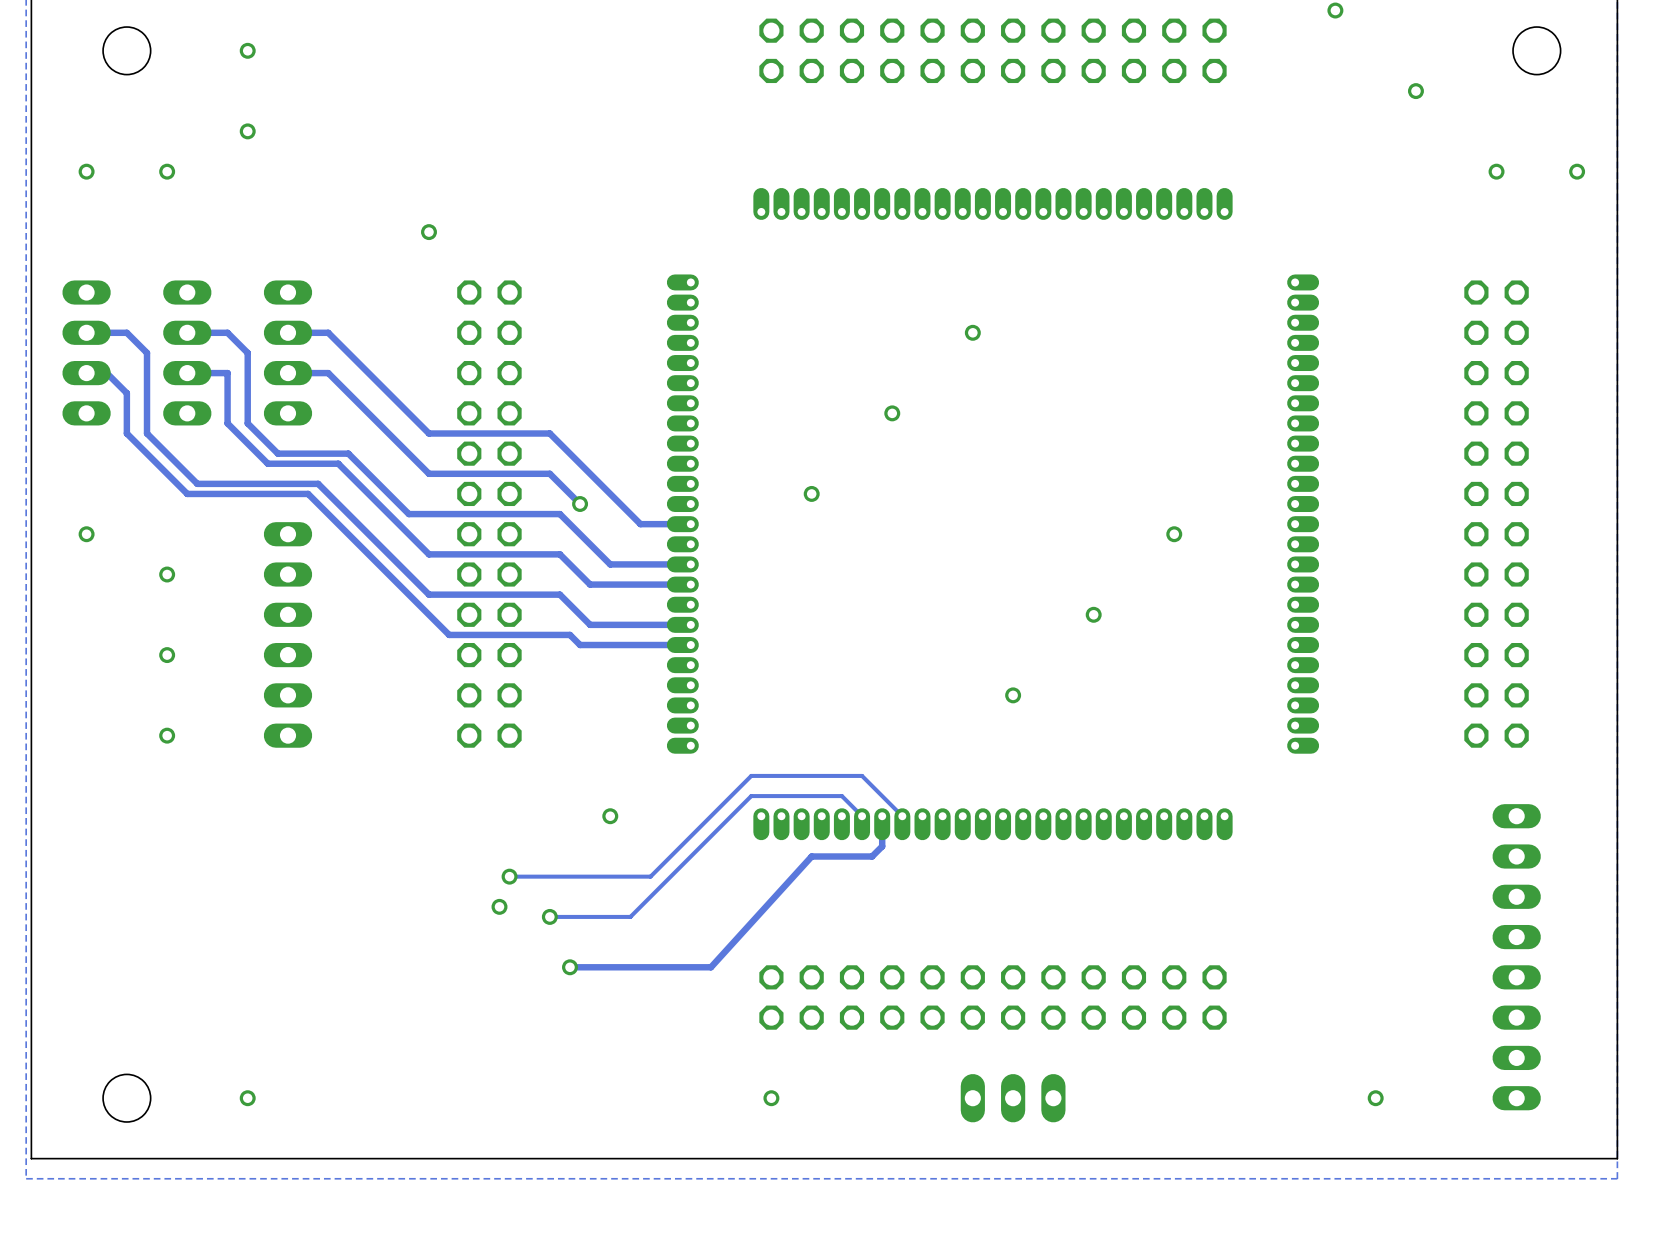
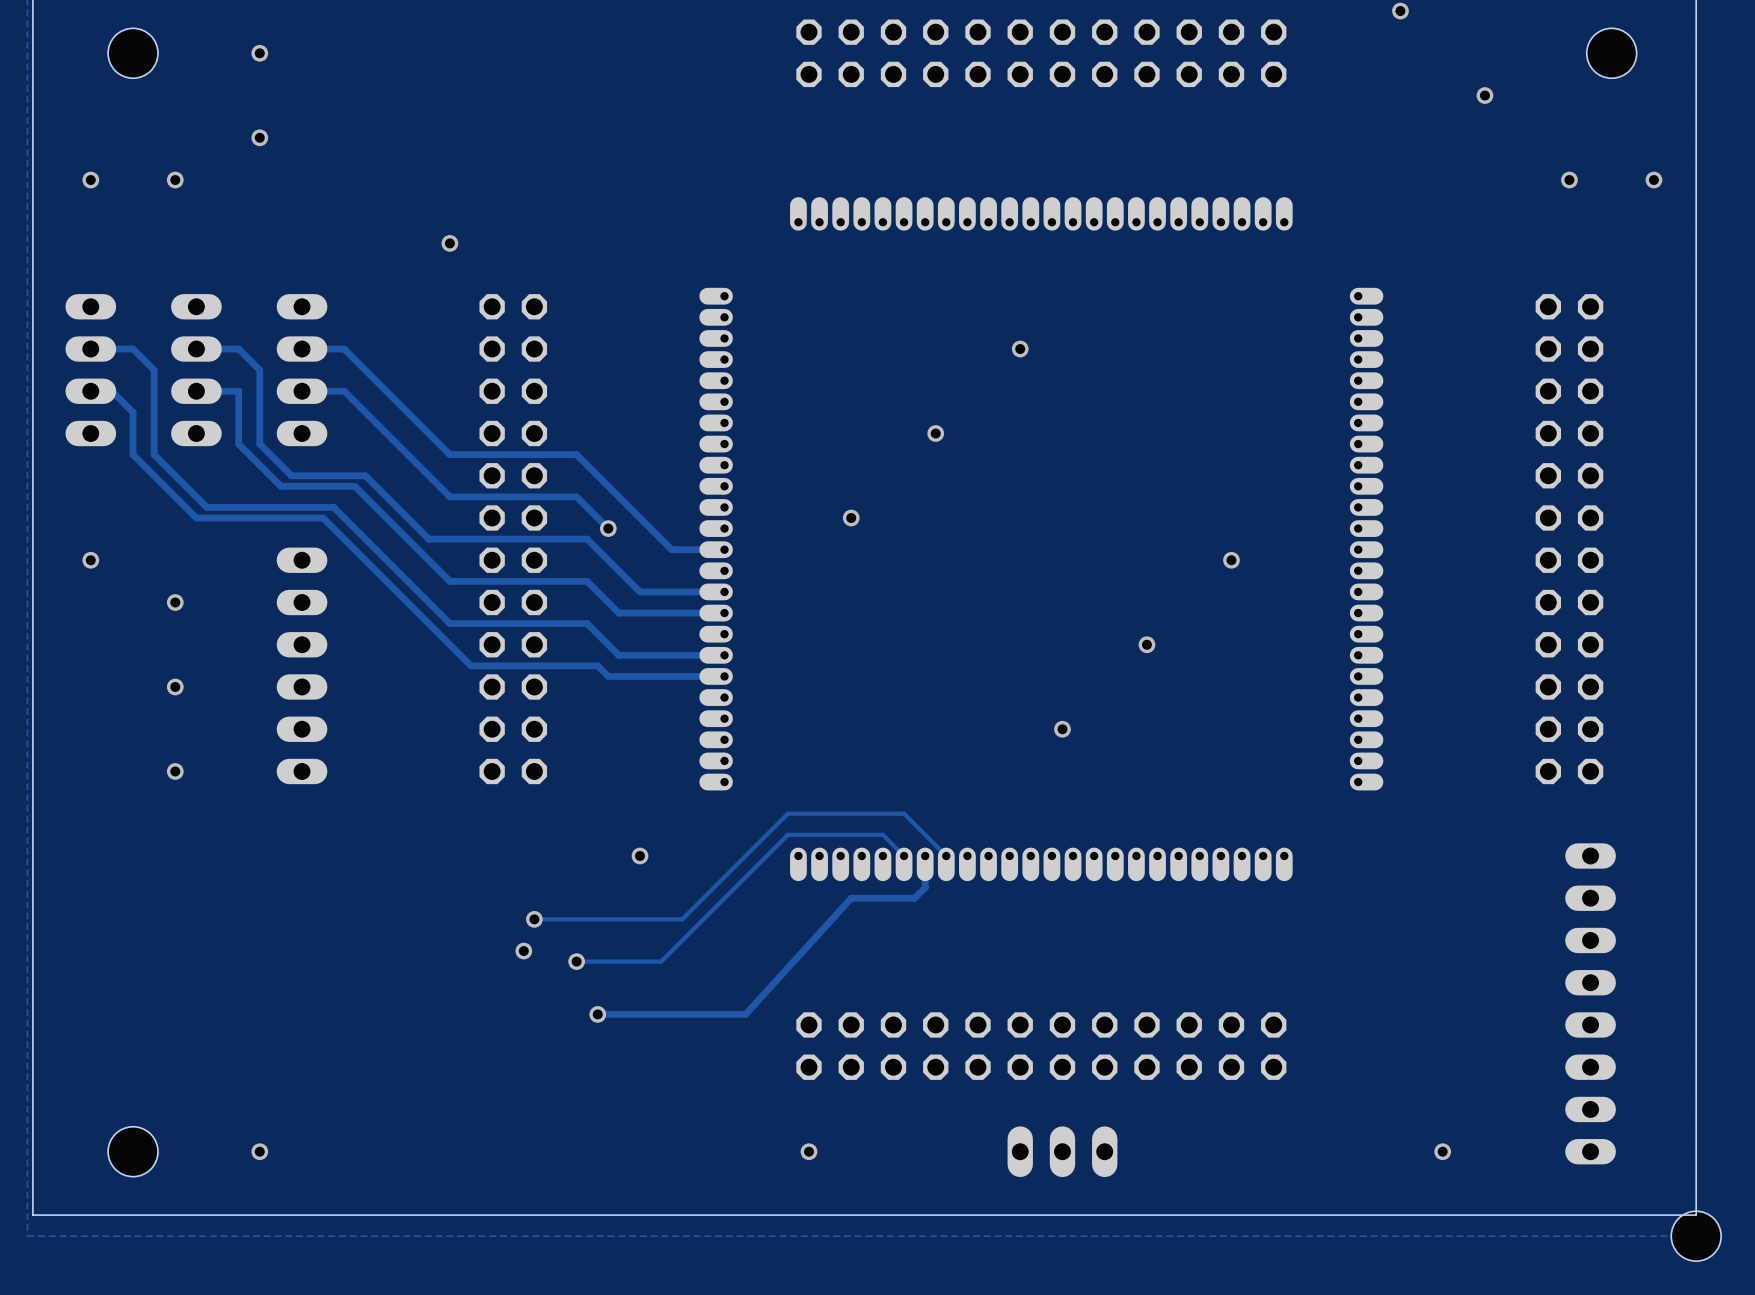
hole: none -> (1696, 1236)

